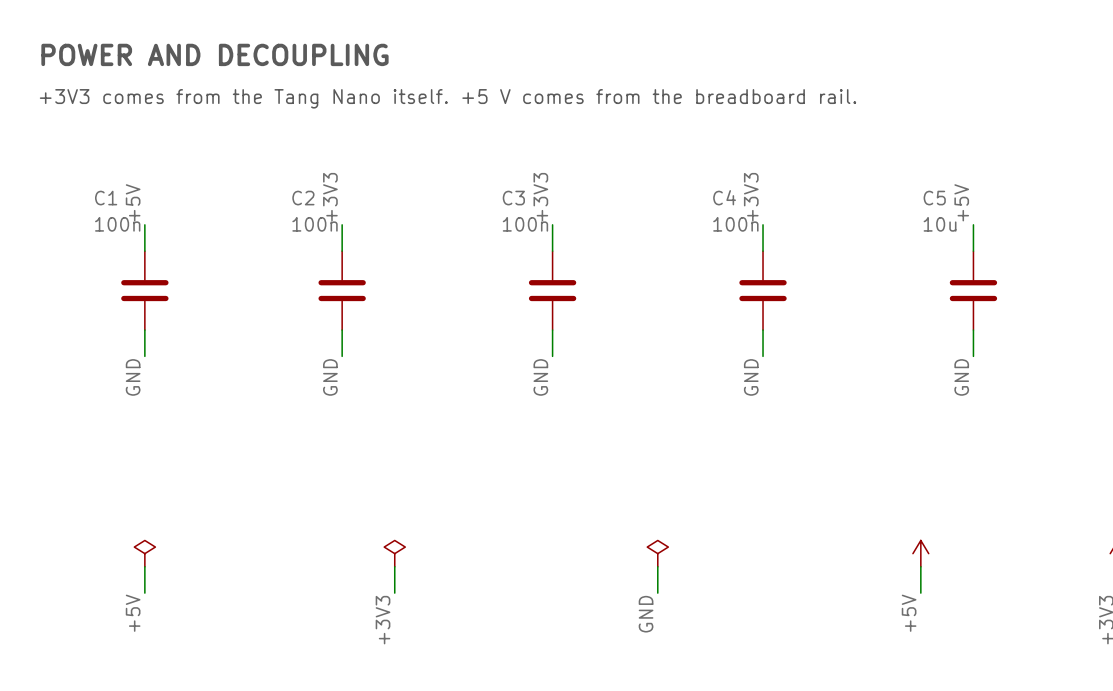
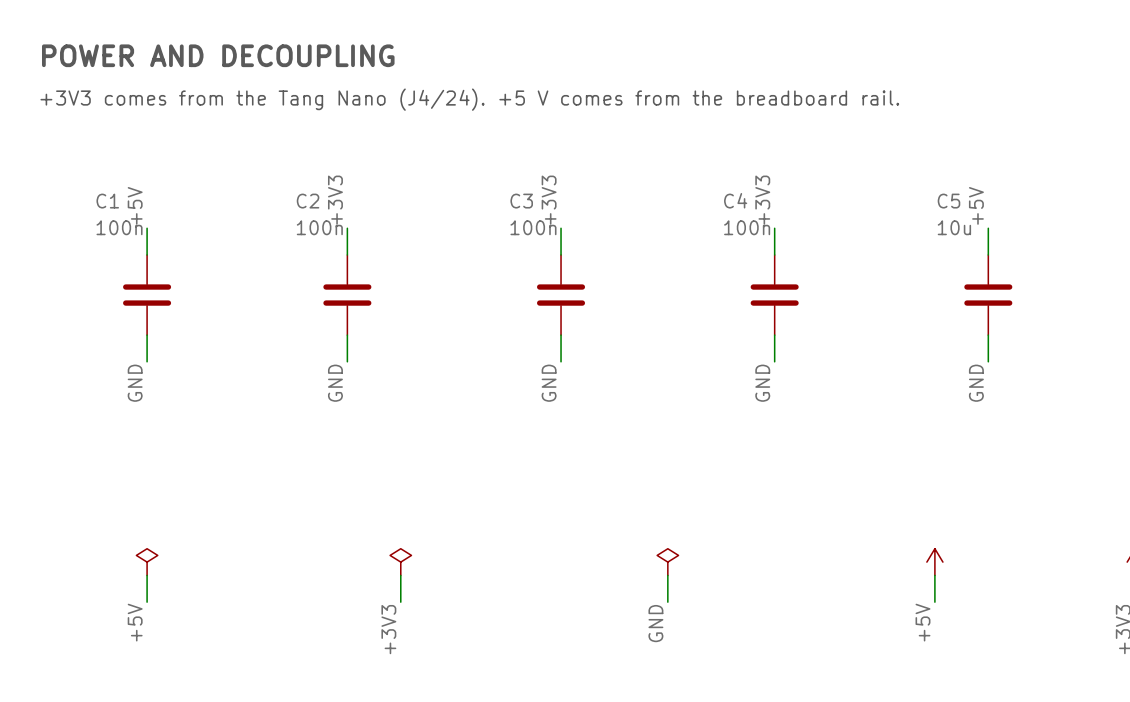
text: +3V3 comes from the Tang Nano itself. +5 V comes from the breadboard rail. (447, 98) -> +3V3 comes from the Tang Nano (J4/24). +5 V comes from the breadboard rail. (469, 99)

